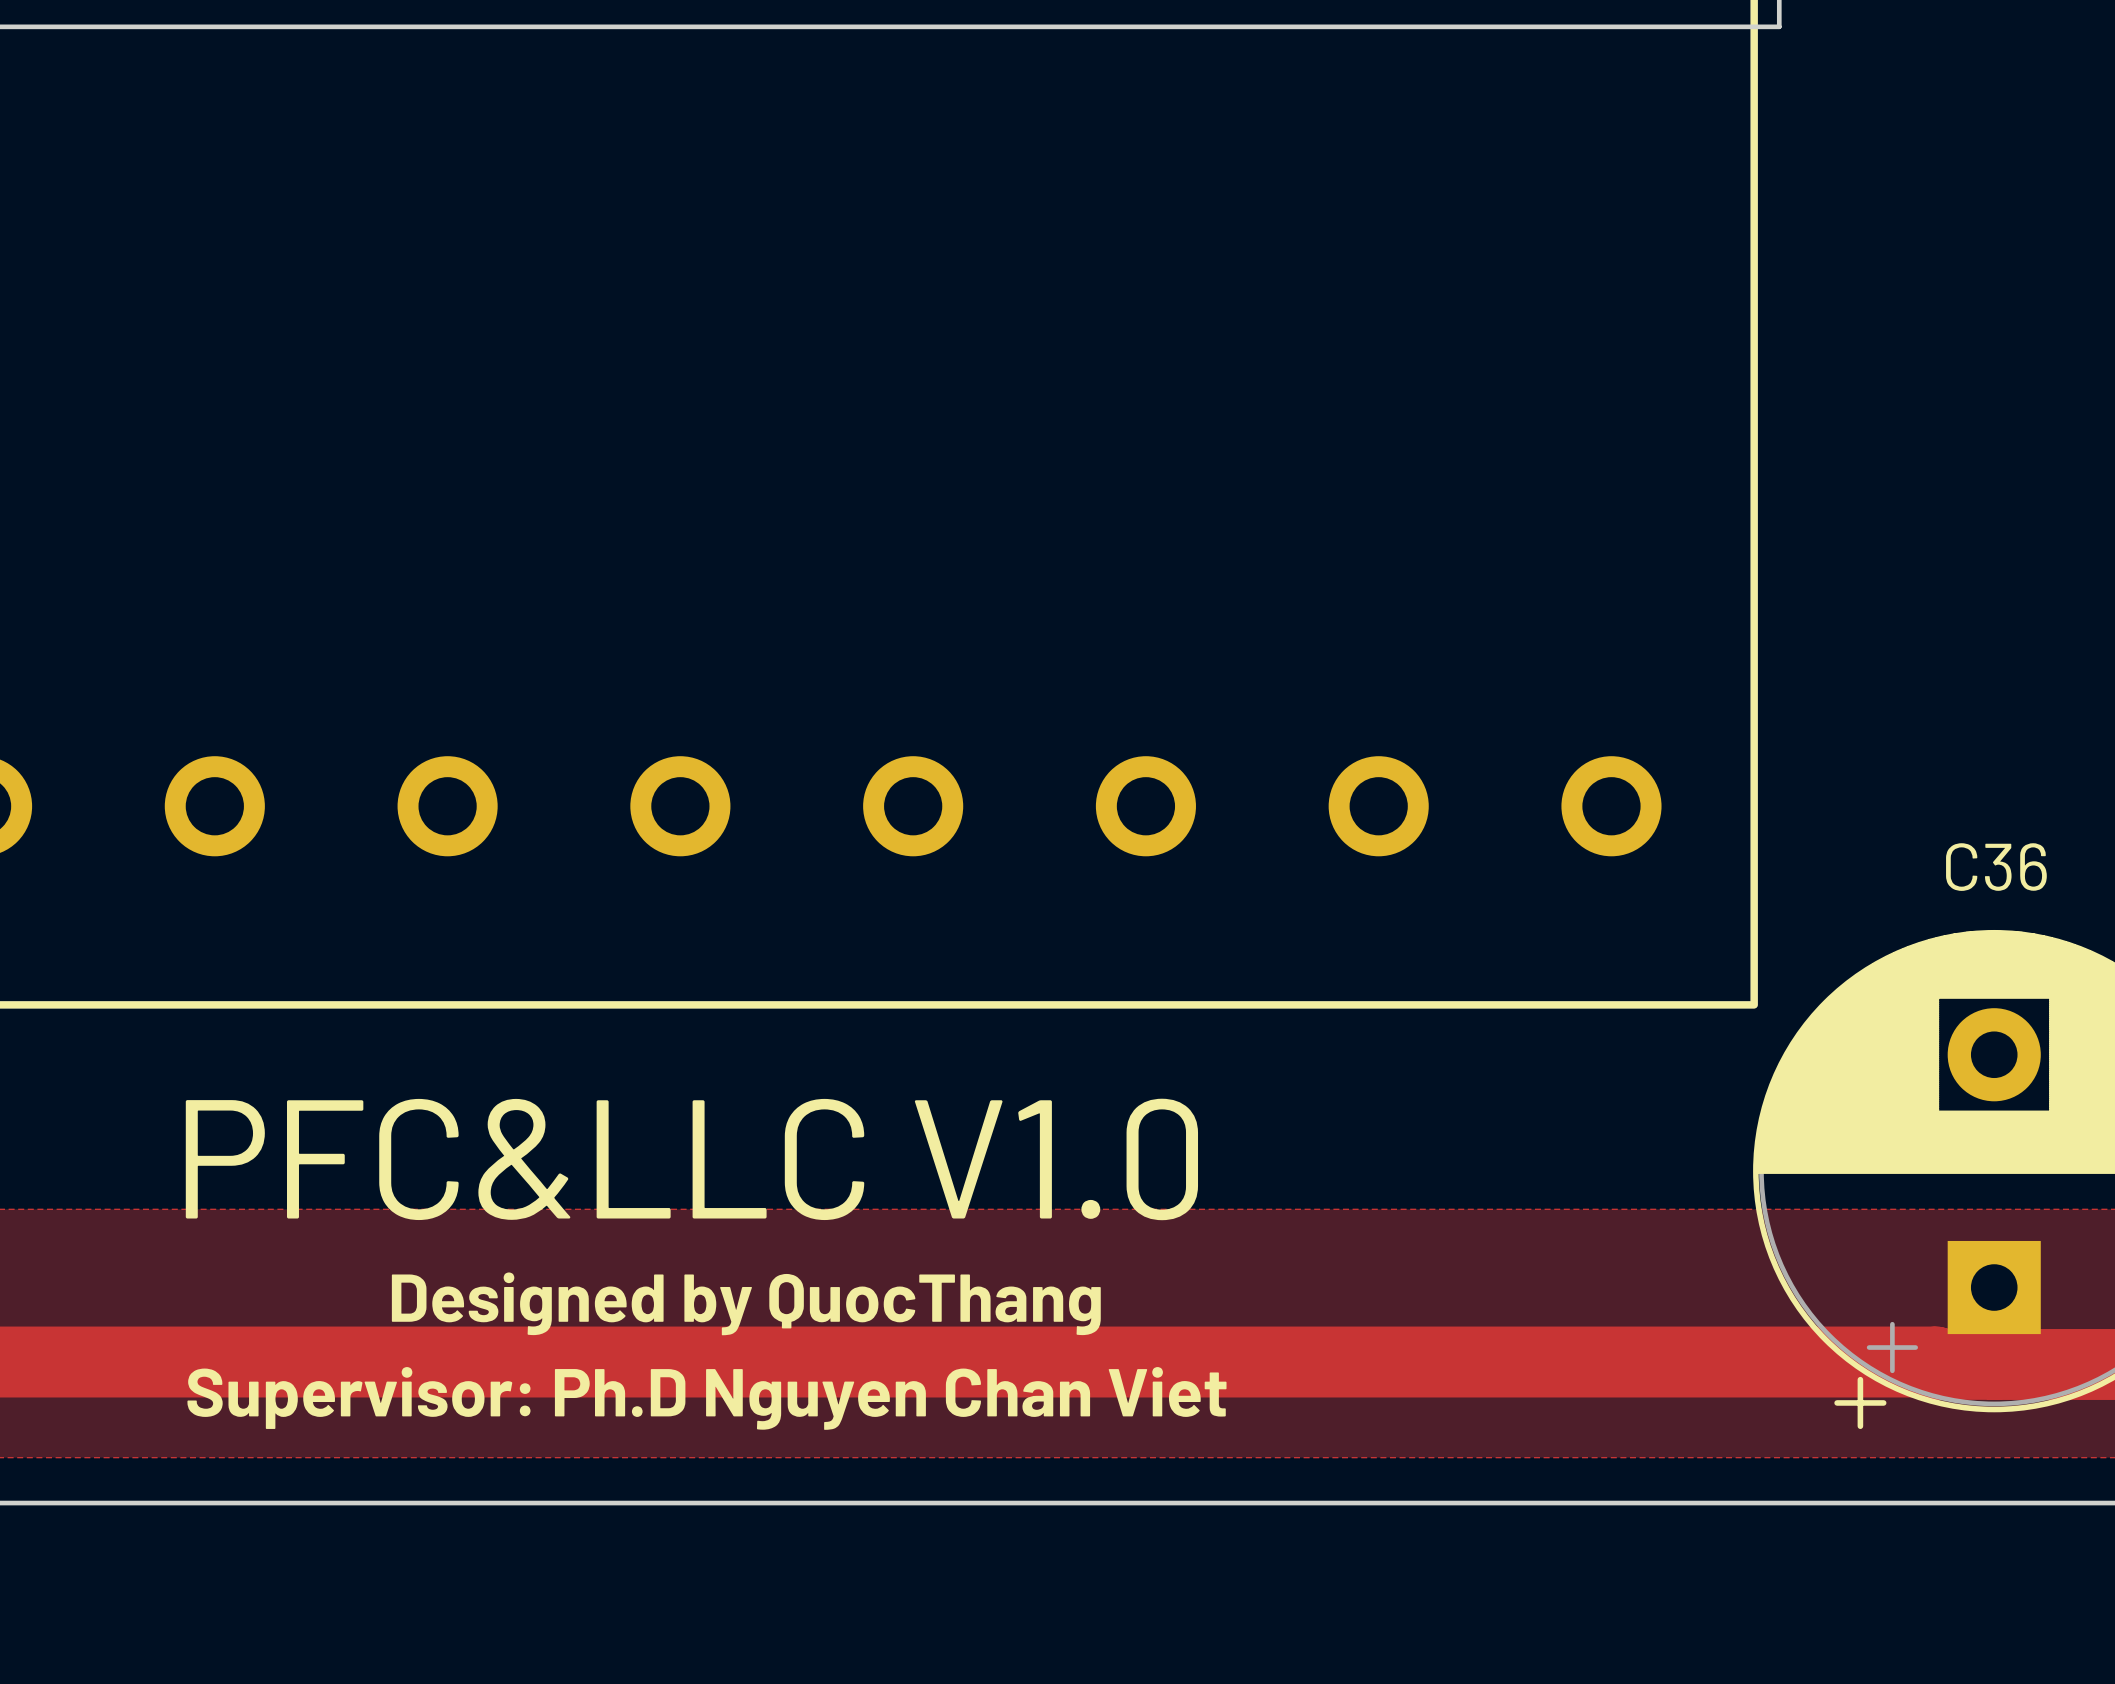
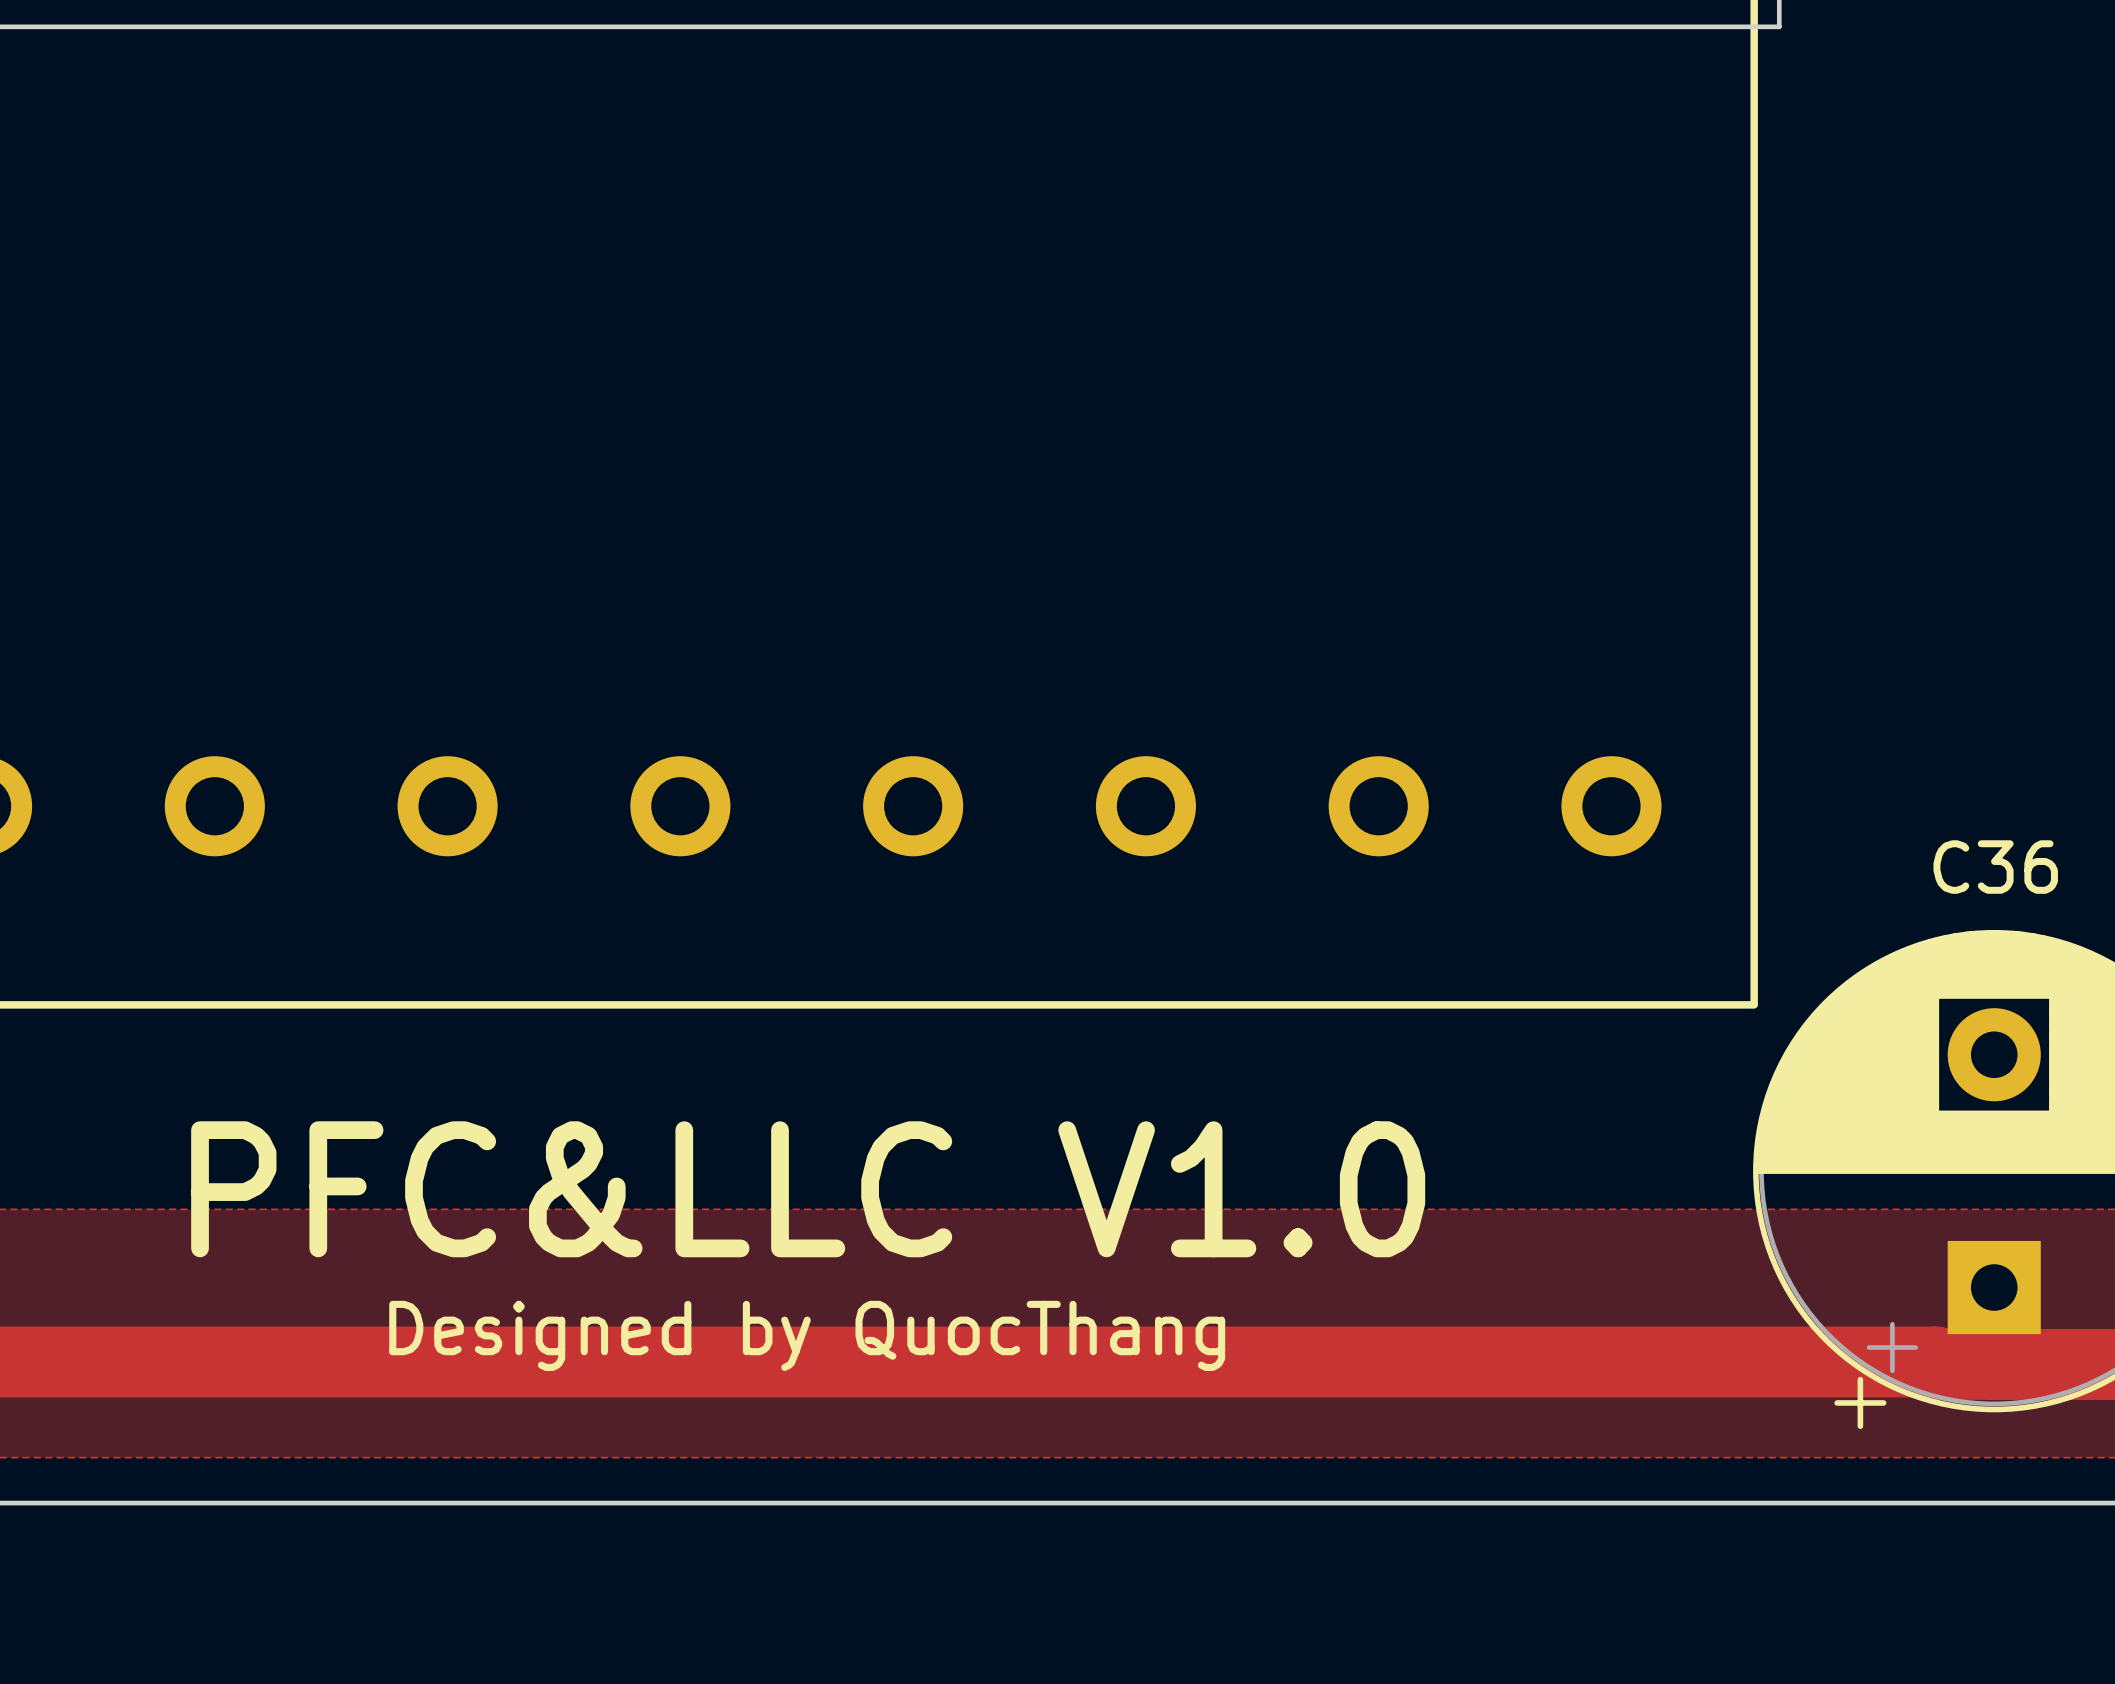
text position: PFC&LLC V1.0 (691, 1159) -> PFC&LLC V1.0 (808, 1189)
text position: Designed by QuocThang (746, 1303) -> Designed by QuocThang (807, 1335)
text: Supervisor: Ph.D Nguyen Chan Viet (706, 1398) -> none

